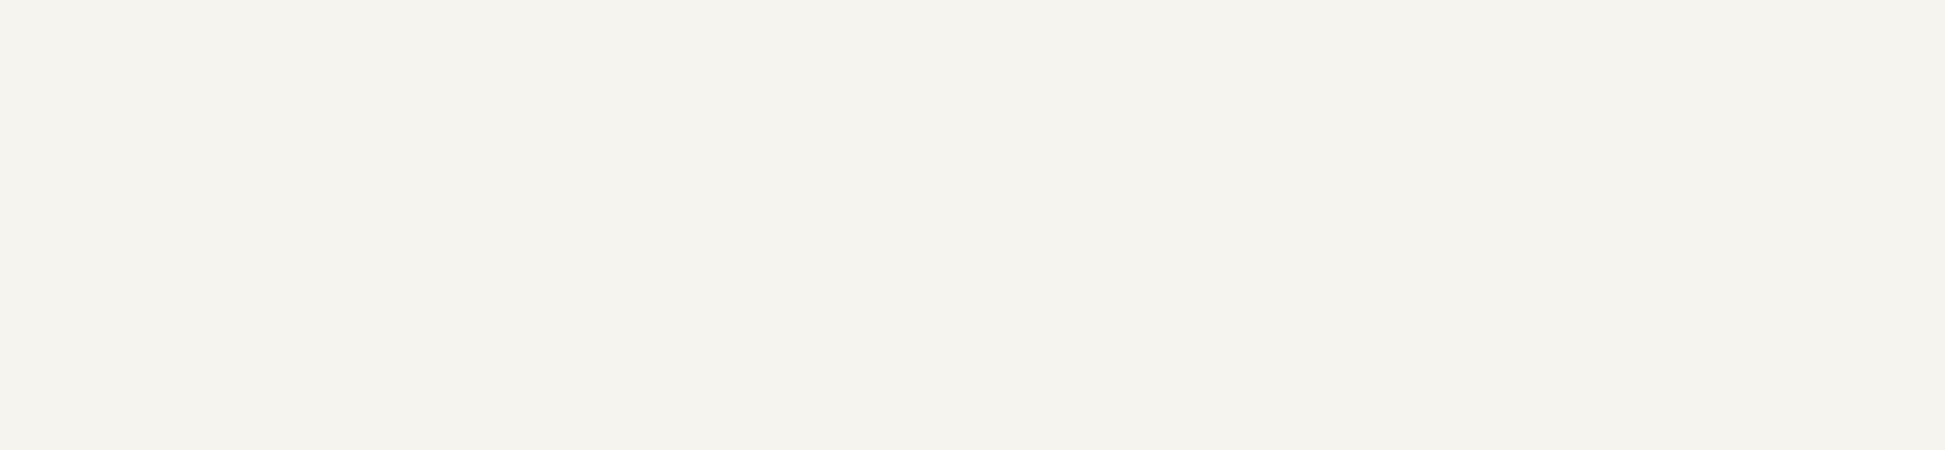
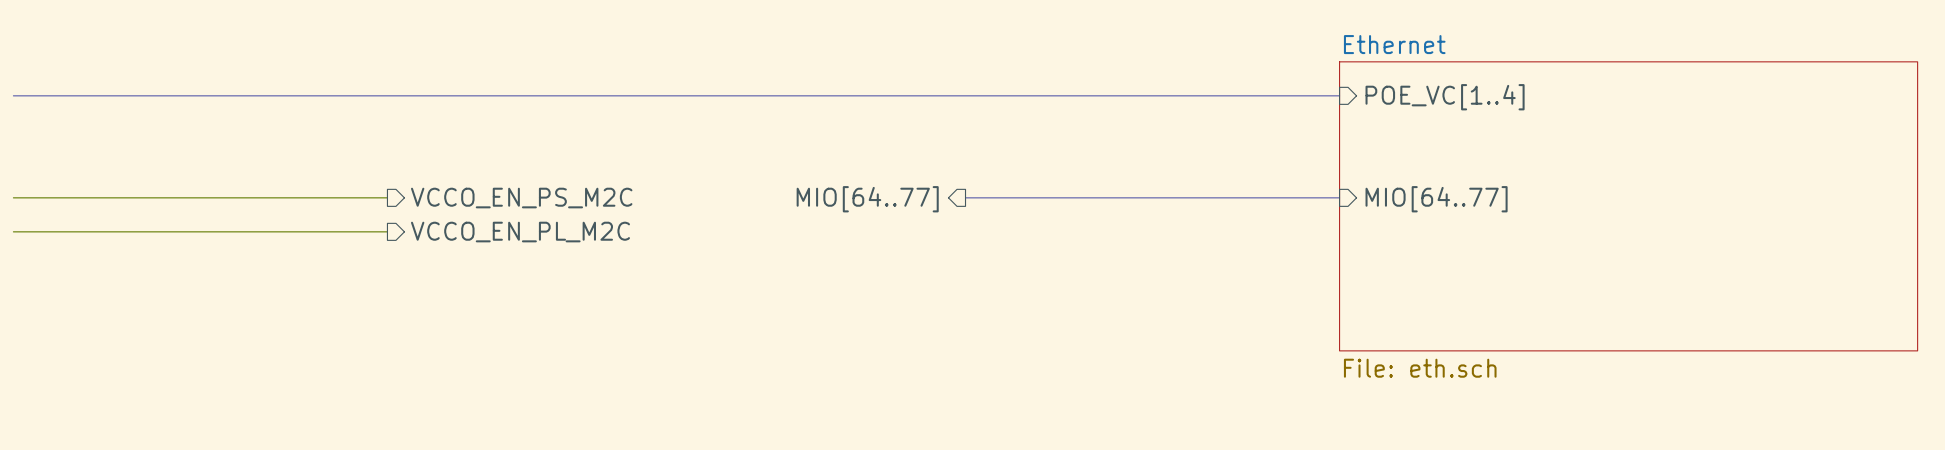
bus: none -> (13, 95) (1339, 95)
sheet pin: none -> POE_VC[1..4] (1445, 97)
wire: none -> (13, 197) (387, 197)
bus: none -> (965, 197) (1339, 197)
sheet pin: none -> VCCO_EN_PS_M2C (521, 198)
sheet pin: none -> MIO[64..77] (867, 199)
sheet pin: none -> MIO[64..77] (1436, 199)
sheet Ethernet: none -> File: eth.sch (1628, 206)
wire: none -> (13, 231) (387, 231)
sheet pin: none -> VCCO_EN_PL_M2C (520, 232)

